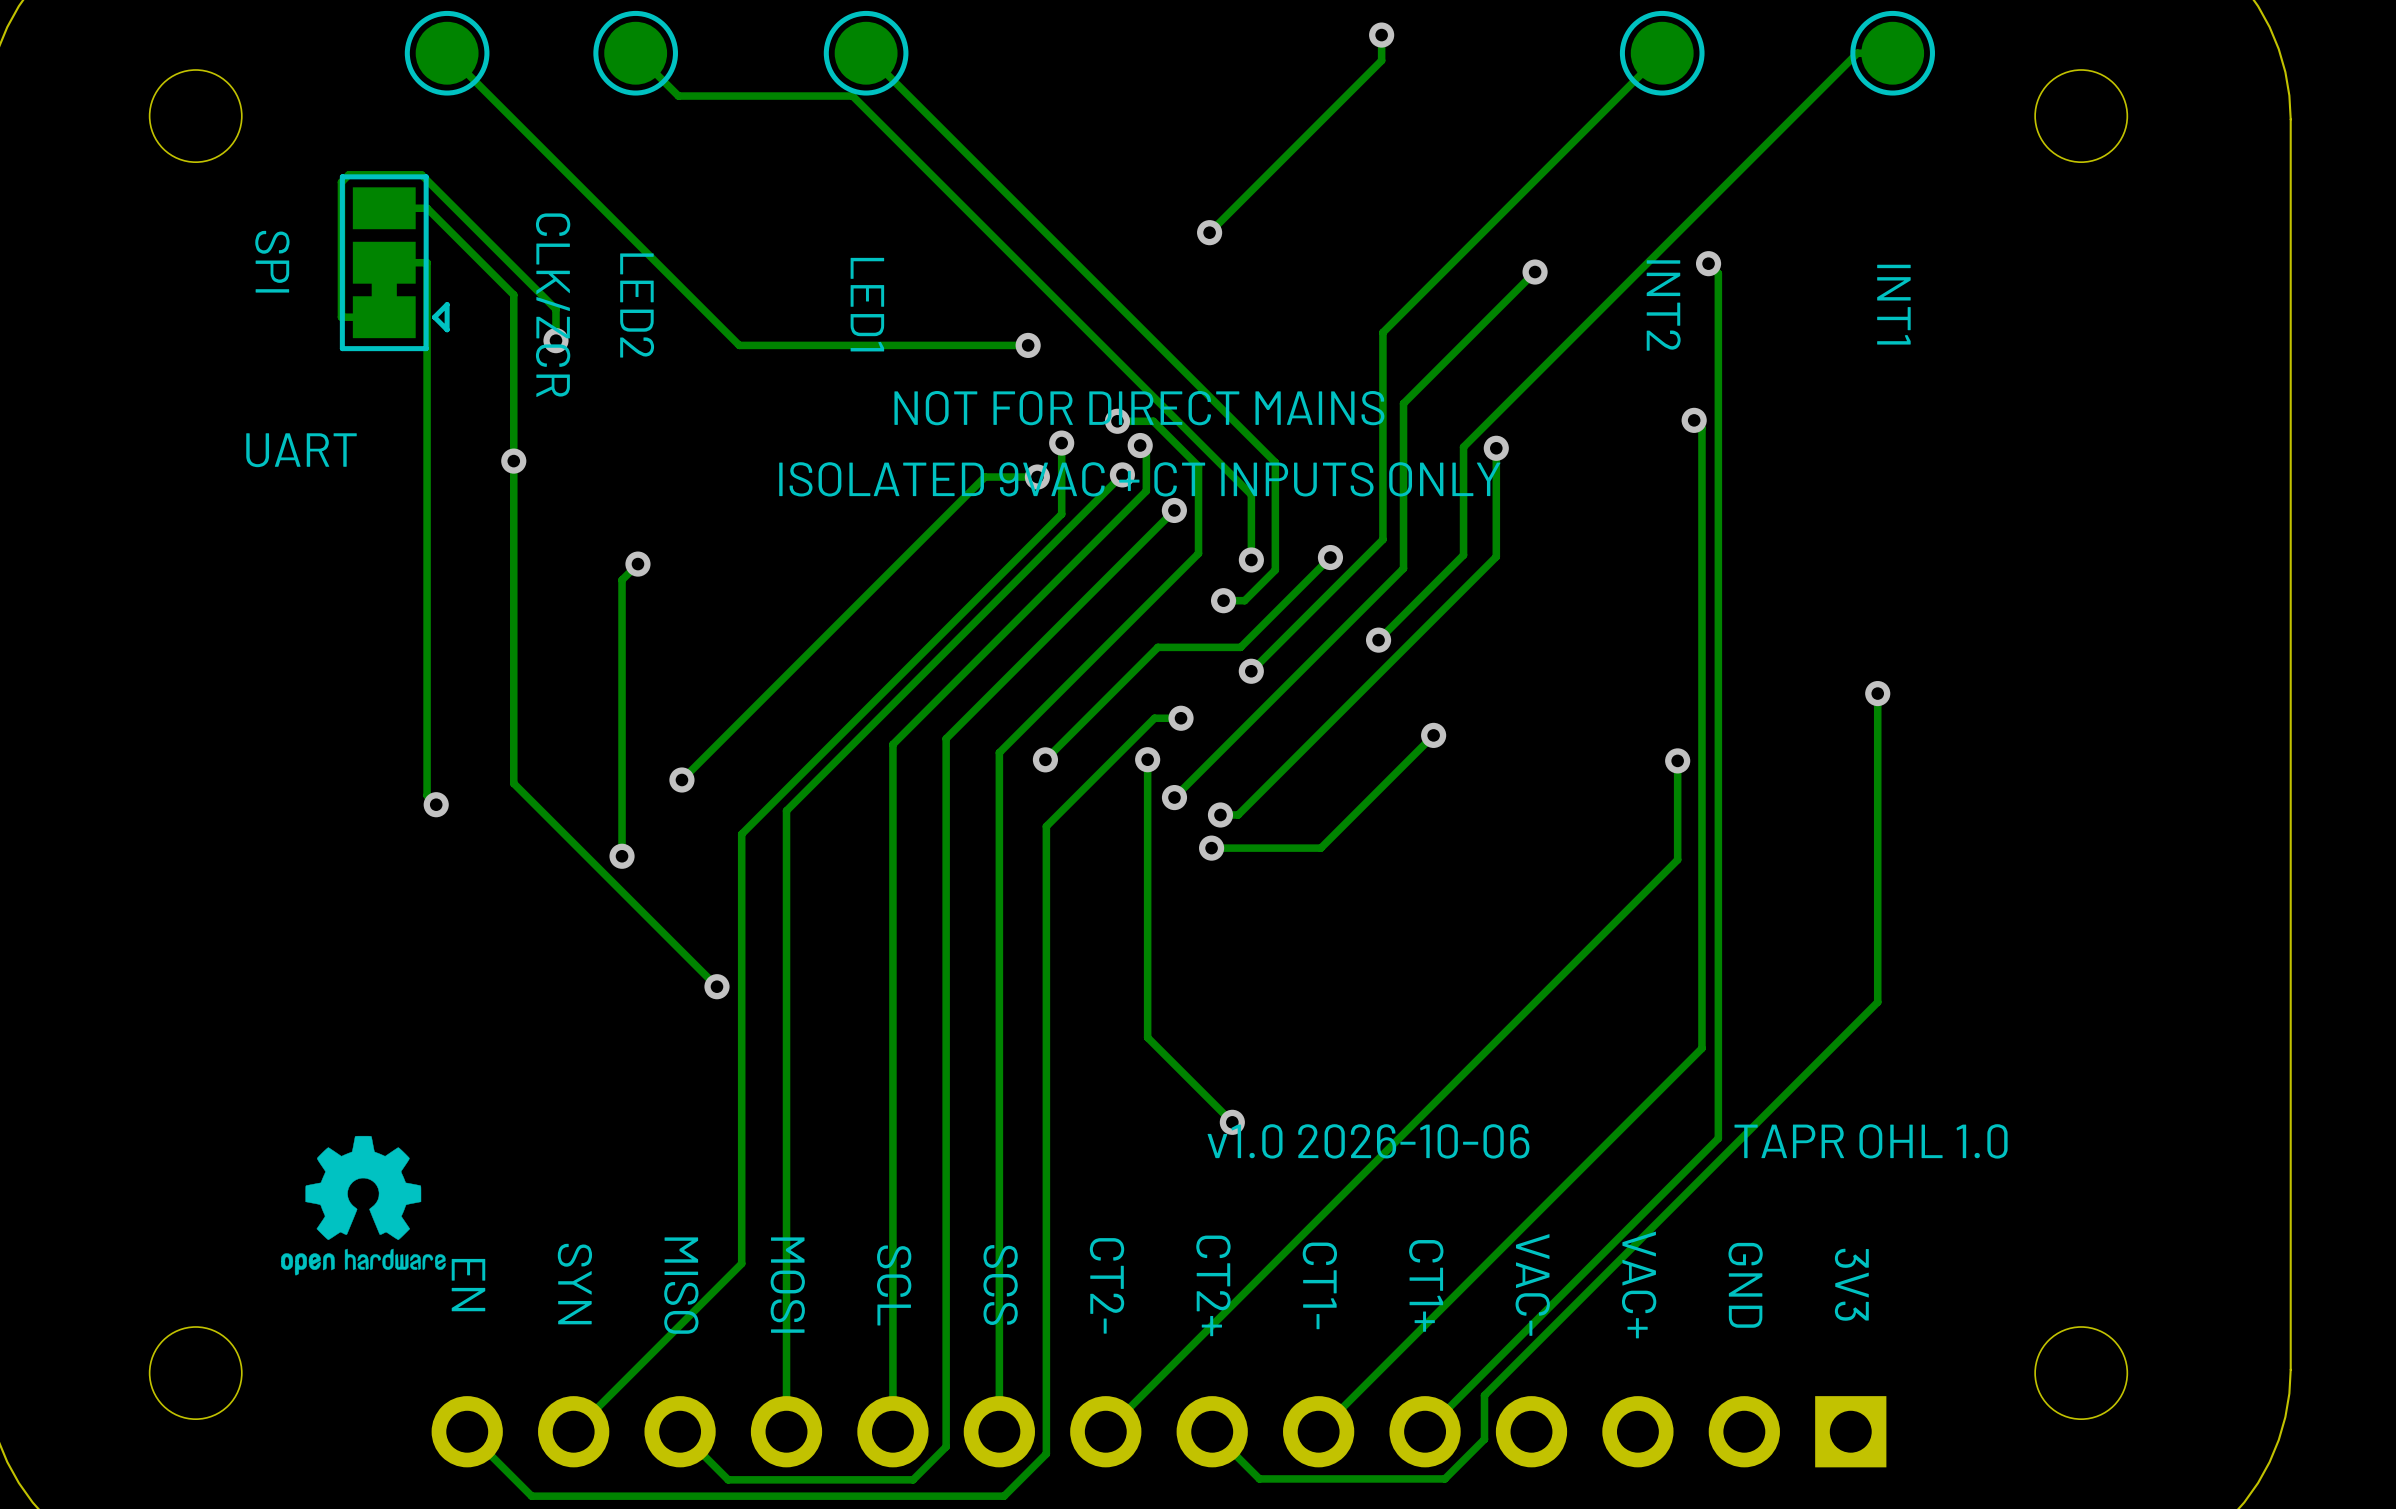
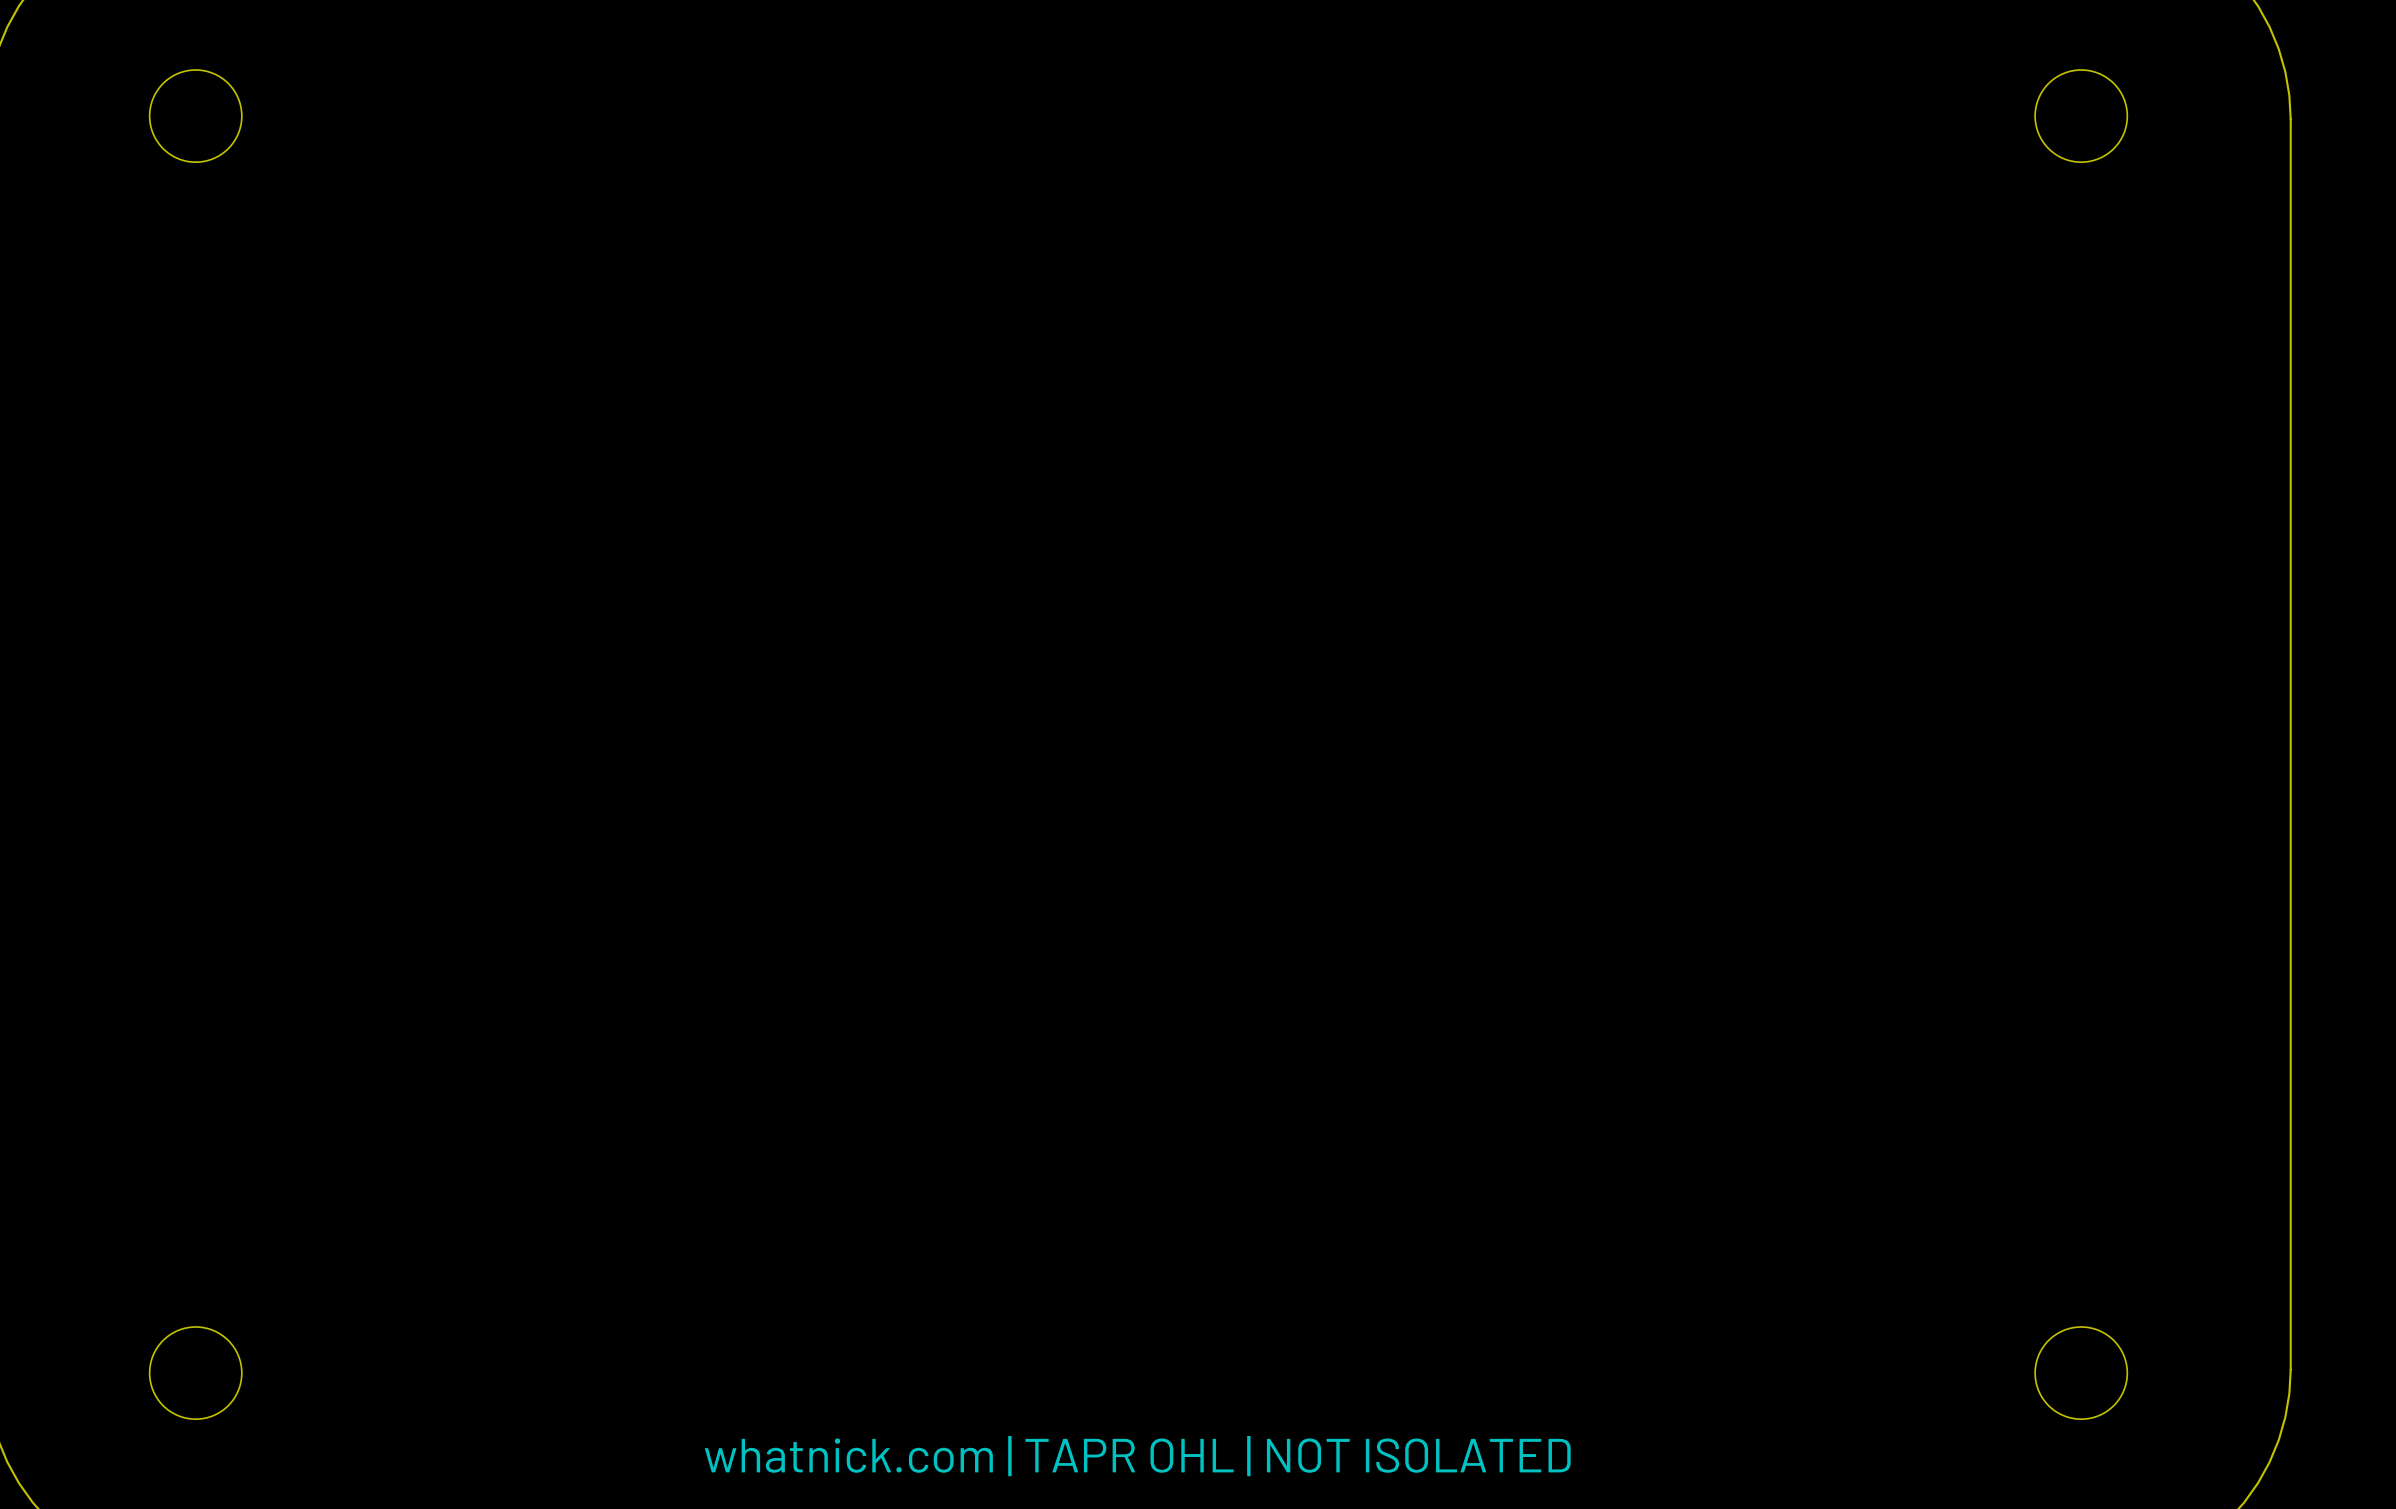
track: (1381, 35) (1381, 60) (1209, 232) -> none
via: (1381, 35) -> none
track: (447, 53) (739, 345) (1028, 345) -> none
part: (447, 53) -> none
track: (635, 53) (678, 96) (852, 96) (1251, 494) (1251, 559) -> none
part: (635, 53) -> none
track: (866, 53) (1275, 462) (1275, 570) (1244, 600) (1223, 600) -> none
part: (866, 53) -> none
track: (1662, 53) (1382, 332) (1382, 539) (1251, 671) -> none
part: (1662, 53) -> none
track: (1892, 53) (1857, 53) (1463, 447) (1463, 555) (1378, 640) -> none
part: (1892, 53) -> none
track: (384, 208) (427, 208) (513, 294) (513, 783) (716, 986) -> none
via: (1209, 232) -> none
text: SPI (272, 261) -> none
track: (384, 262) (427, 262) (427, 795) (436, 804) -> none
part: (394, 262) -> none
track: (1708, 263) (1718, 273) (1718, 1138) (1425, 1431) -> none
via: (1708, 263) -> none
track: (1535, 272) (1403, 403) (1403, 568) (1174, 797) -> none
via: (1535, 272) -> none
text: LED1 (867, 304) -> none
text: INT1 (1893, 304) -> none
text: CLK/ZCR (553, 305) -> none
text: LED2 (637, 305) -> none
text: INT2 (1663, 305) -> none
track: (384, 317) (341, 317) (341, 182) (348, 174) (421, 174) (555, 309) (555, 340) -> none
via: (555, 340) -> none
via: (1028, 345) -> none
text: NOT FOR DIRECT MAINS (1139, 408) -> none
track: (1694, 420) (1701, 428) (1701, 1048) (1318, 1431) -> none
via: (1694, 420) -> none
track: (1117, 421) (1153, 421) (1198, 466) (1198, 553) (999, 752) (999, 1431) -> none
via: (1117, 421) -> none
track: (1061, 443) (1061, 514) (741, 834) (741, 1263) (573, 1431) -> none
via: (1061, 443) -> none
track: (1140, 445) (1146, 451) (1146, 491) (892, 744) (892, 1431) -> none
via: (1140, 445) -> none
track: (1496, 448) (1496, 556) (1238, 814) (1220, 814) -> none
via: (1496, 448) -> none
text: UART (301, 450) -> none
via: (513, 461) -> none
track: (1122, 474) (786, 810) (786, 1431) -> none
via: (1122, 474) -> none
track: (1037, 477) (984, 477) (681, 780) -> none
via: (1037, 477) -> none
text: ISOLATED 9VAC + CT INPUTS ONLY (1139, 479) -> none
track: (1174, 510) (946, 738) (946, 1446) (913, 1479) (728, 1479) (680, 1431) -> none
via: (1174, 510) -> none
track: (1330, 557) (1240, 647) (1157, 647) (1045, 759) -> none
via: (1330, 557) -> none
via: (1251, 559) -> none
track: (637, 564) (622, 580) (622, 856) -> none
via: (637, 564) -> none
via: (1223, 600) -> none
via: (1378, 640) -> none
via: (1251, 671) -> none
track: (1877, 693) (1877, 1002) (1484, 1395) (1484, 1439) (1444, 1478) (1259, 1478) (1212, 1431) -> none
via: (1877, 693) -> none
track: (1181, 718) (1154, 718) (1046, 826) (1046, 1453) (1004, 1496) (531, 1496) (467, 1431) -> none
via: (1181, 718) -> none
track: (1433, 735) (1320, 848) (1211, 848) -> none
via: (1433, 735) -> none
via: (1045, 759) -> none
track: (1147, 759) (1147, 1037) (1232, 1122) -> none
via: (1147, 759) -> none
track: (1677, 760) (1677, 859) (1105, 1431) -> none
via: (1677, 760) -> none
via: (681, 780) -> none
via: (1174, 797) -> none
via: (436, 804) -> none
via: (1220, 814) -> none
via: (1211, 848) -> none
via: (622, 856) -> none
via: (716, 986) -> none
via: (1232, 1122) -> none
drawing: [281, 1135, 446, 1276] -> none
text: v1.0 2026-10-06 (1368, 1141) -> none
text: TAPR OHL 1.0 (1871, 1141) -> none
text: SYN (574, 1284) -> none
text: VAC- (1532, 1284) -> none
text: VAC+ (1639, 1284) -> none
text: 3V3 (1851, 1284) -> none
text: EN (468, 1285) -> none
text: MISO (681, 1285) -> none
text: MOSI (787, 1285) -> none
text: SCL (894, 1285) -> none
text: SCS (1000, 1285) -> none
text: CT2- (1107, 1285) -> none
text: CT2+ (1213, 1285) -> none
text: CT1- (1319, 1285) -> none
text: CT1+ (1426, 1285) -> none
text: GND (1745, 1285) -> none
part: (1159, 1431) -> none
text: none -> whatnick.com | TAPR OHL | NOT ISOLATED (1137, 1456)

